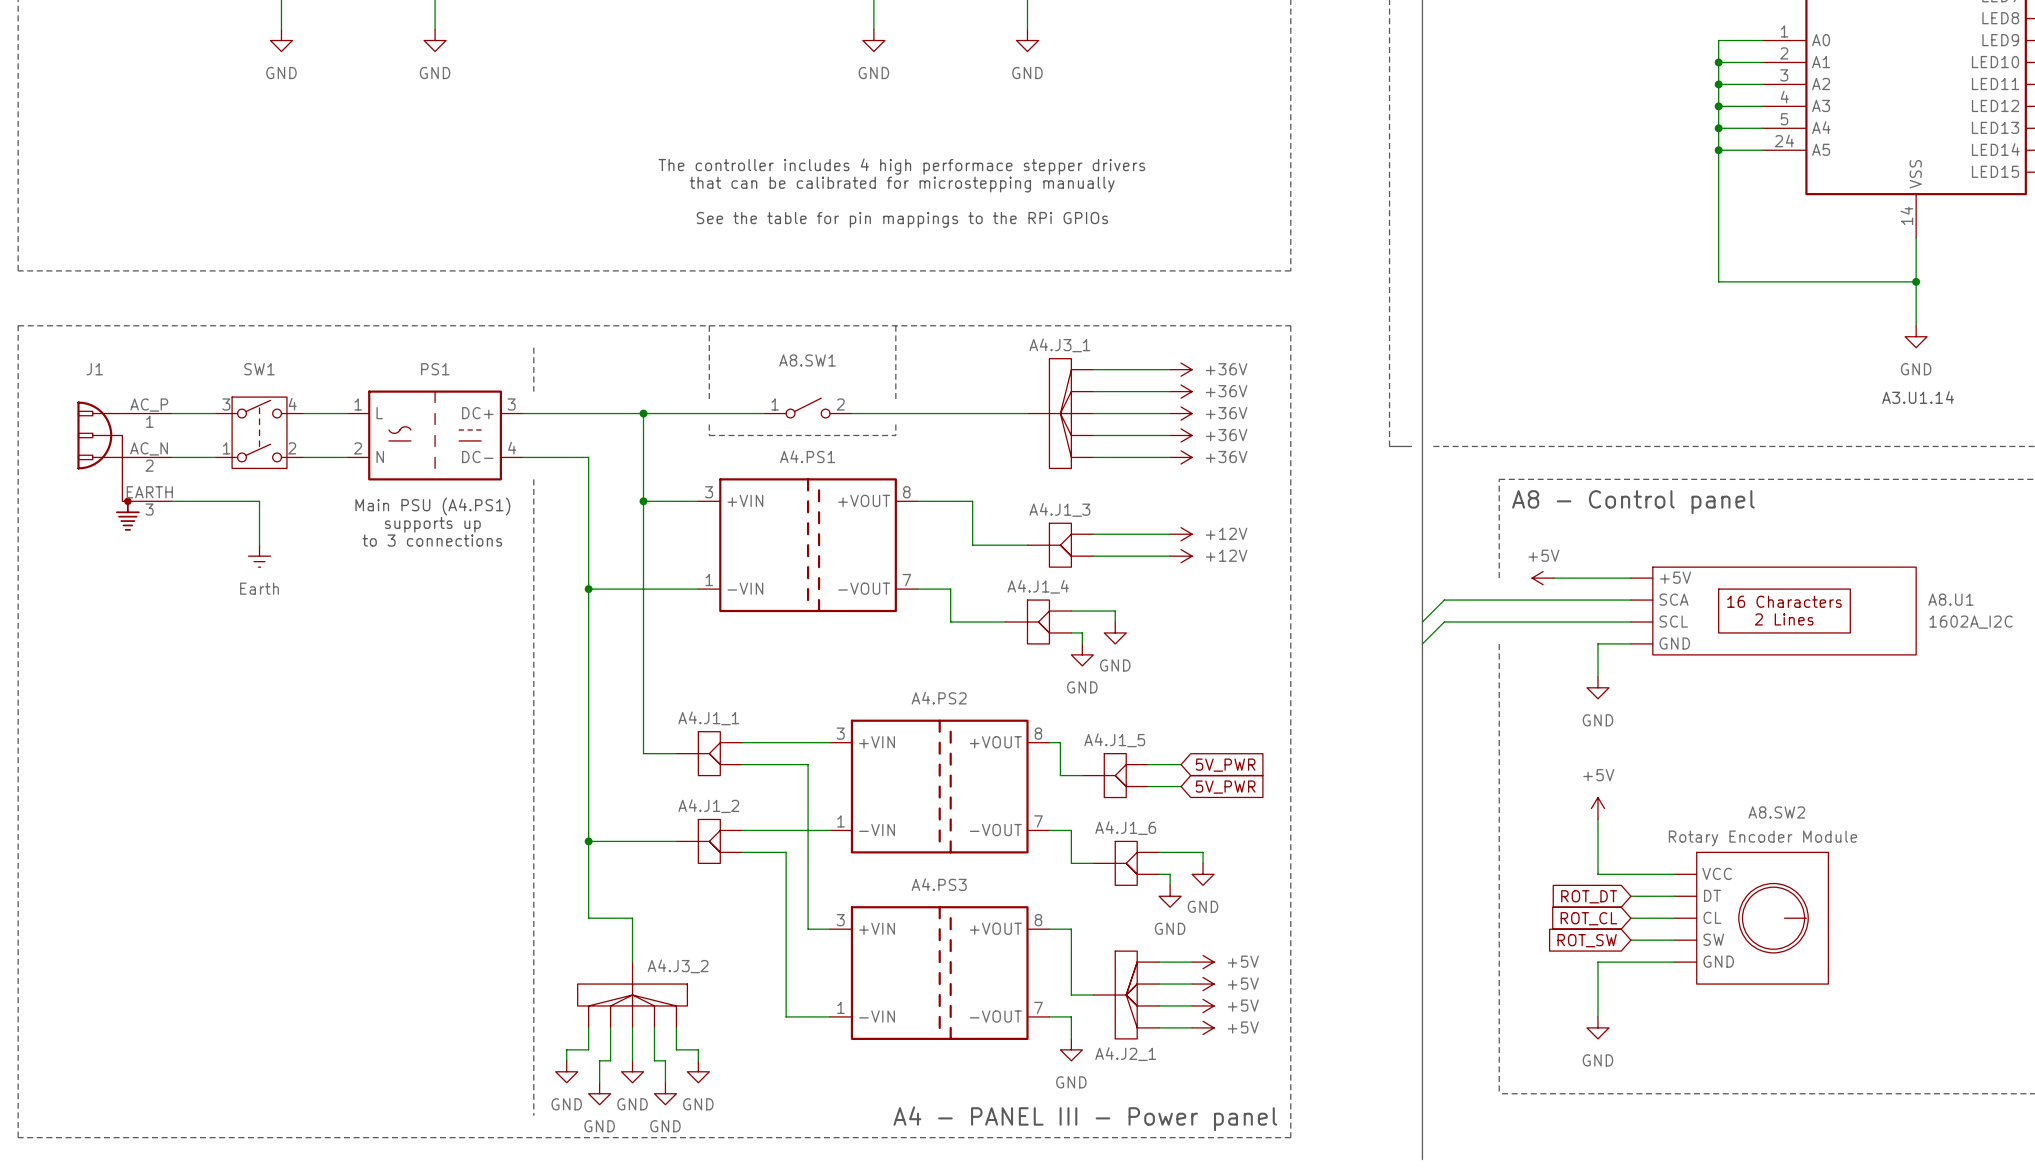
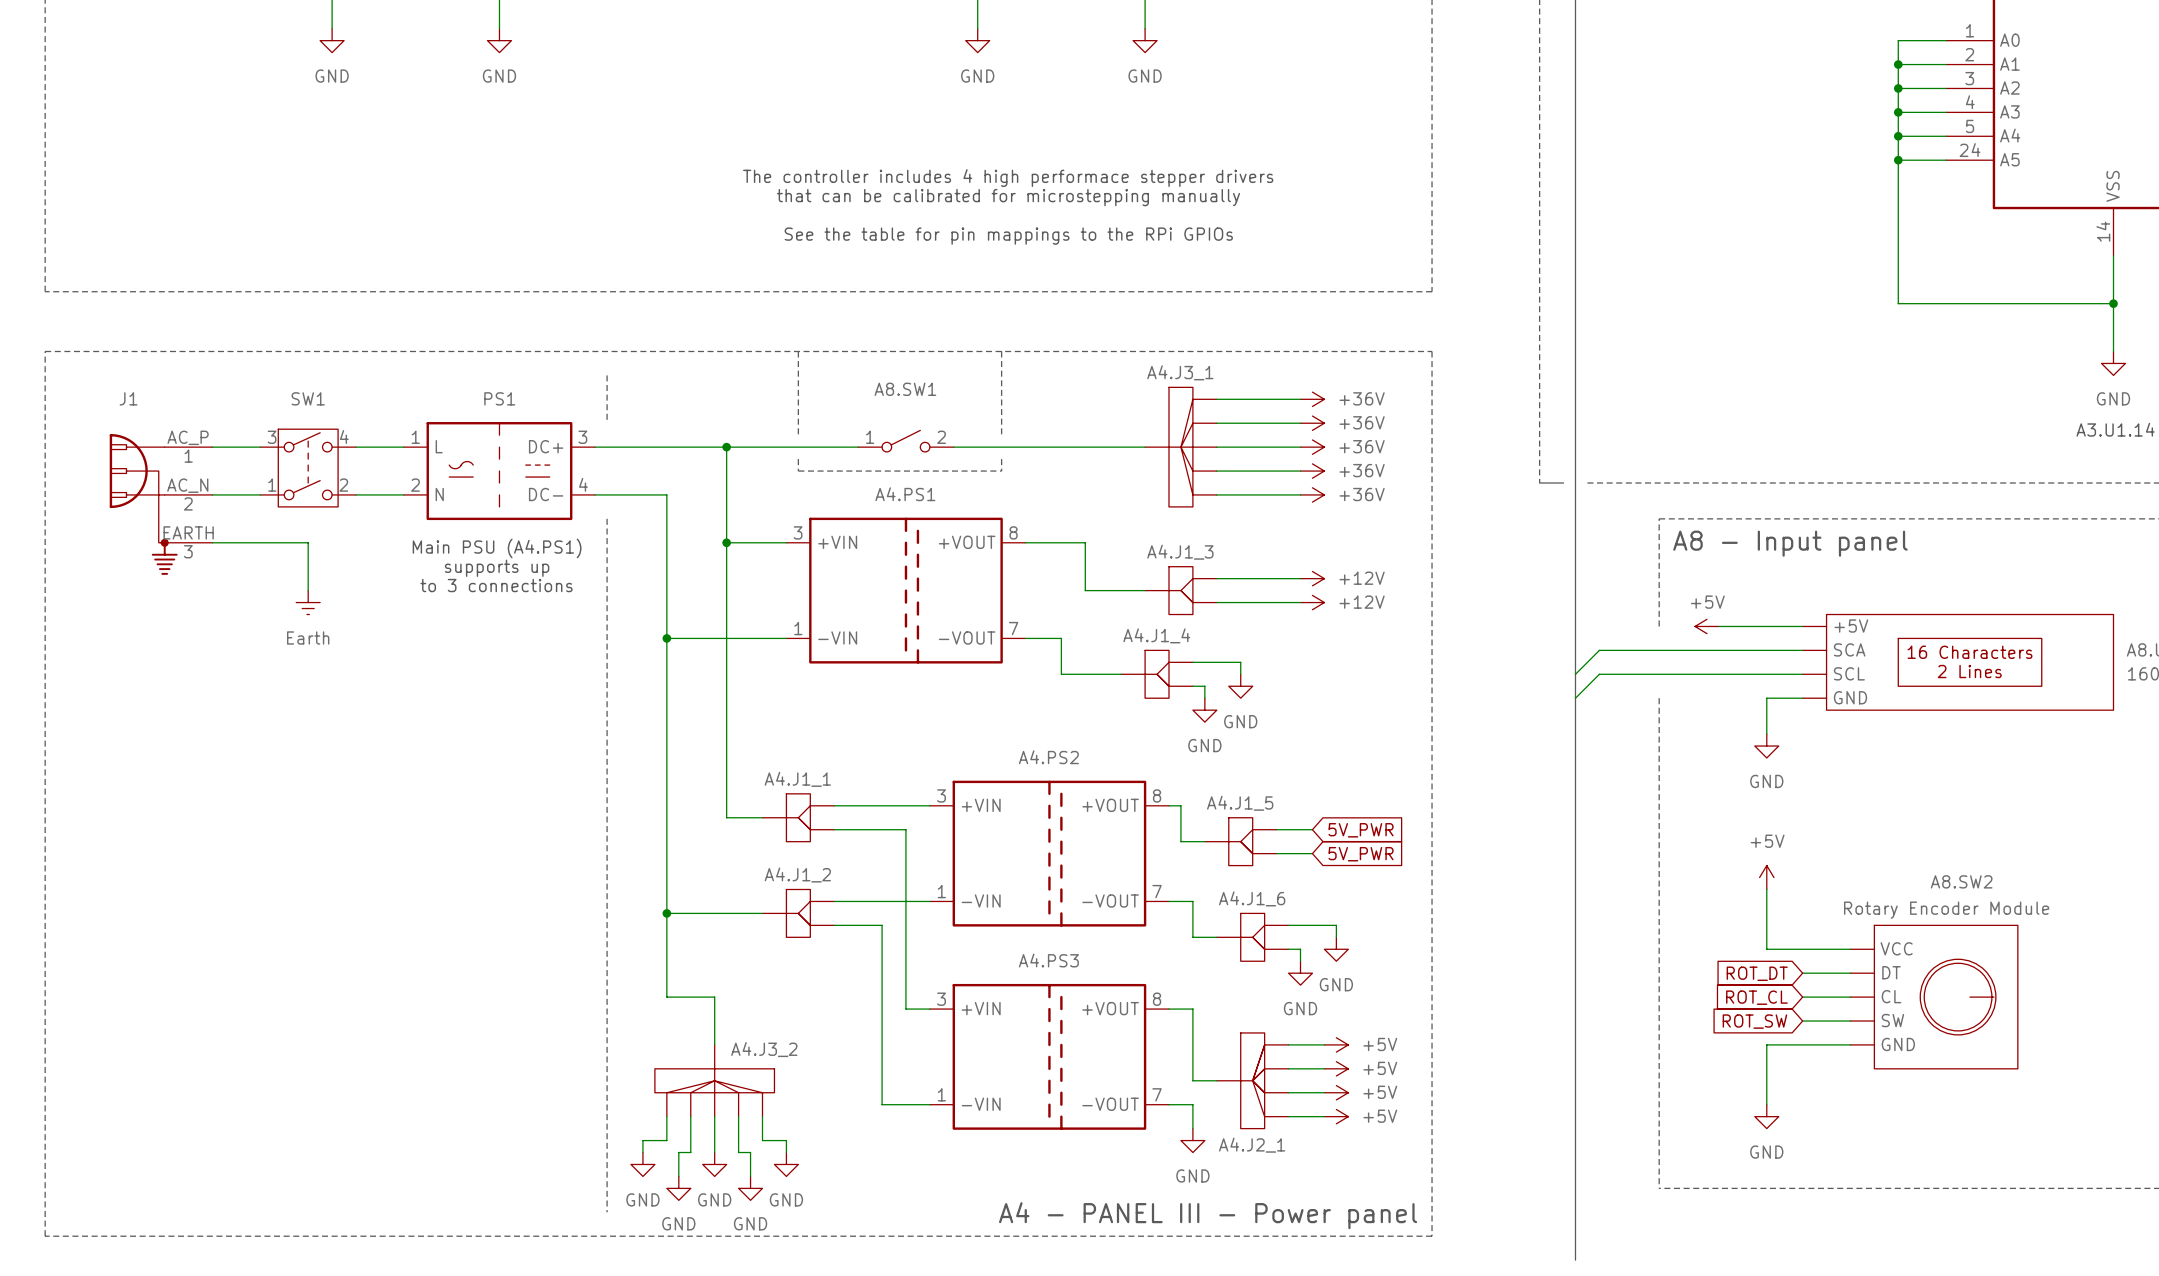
text: A8 - Control panel (1633, 502) -> A8 - Input panel (1790, 543)

